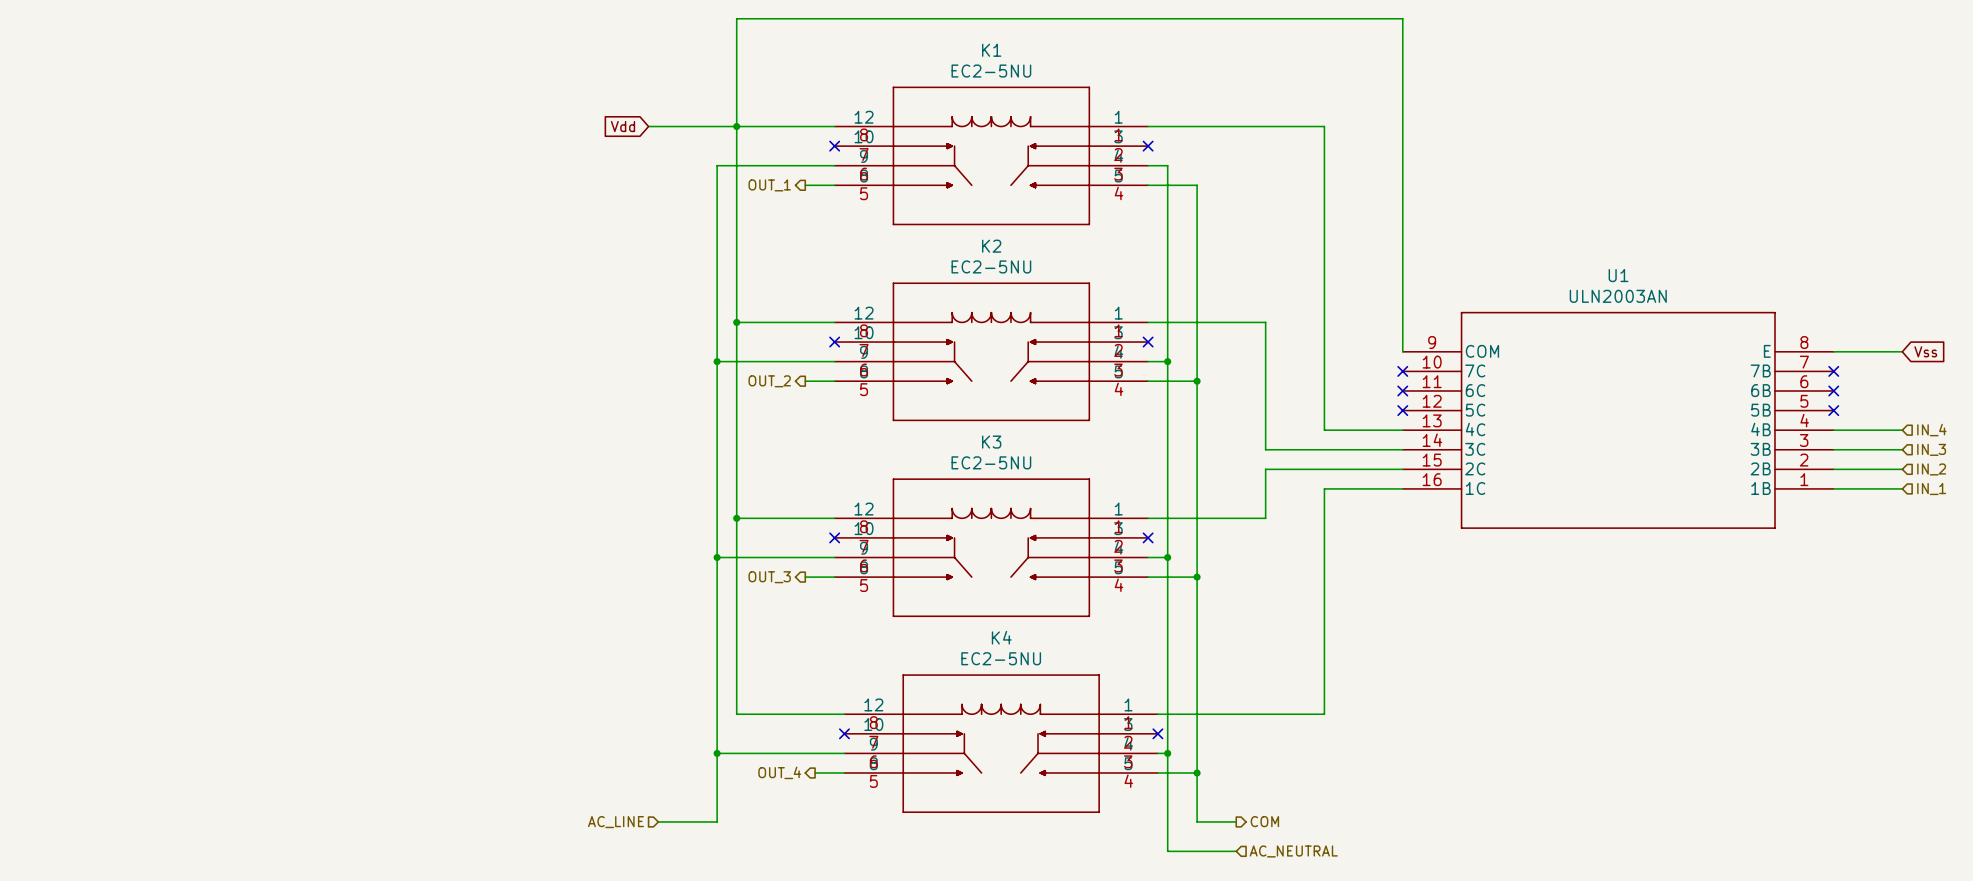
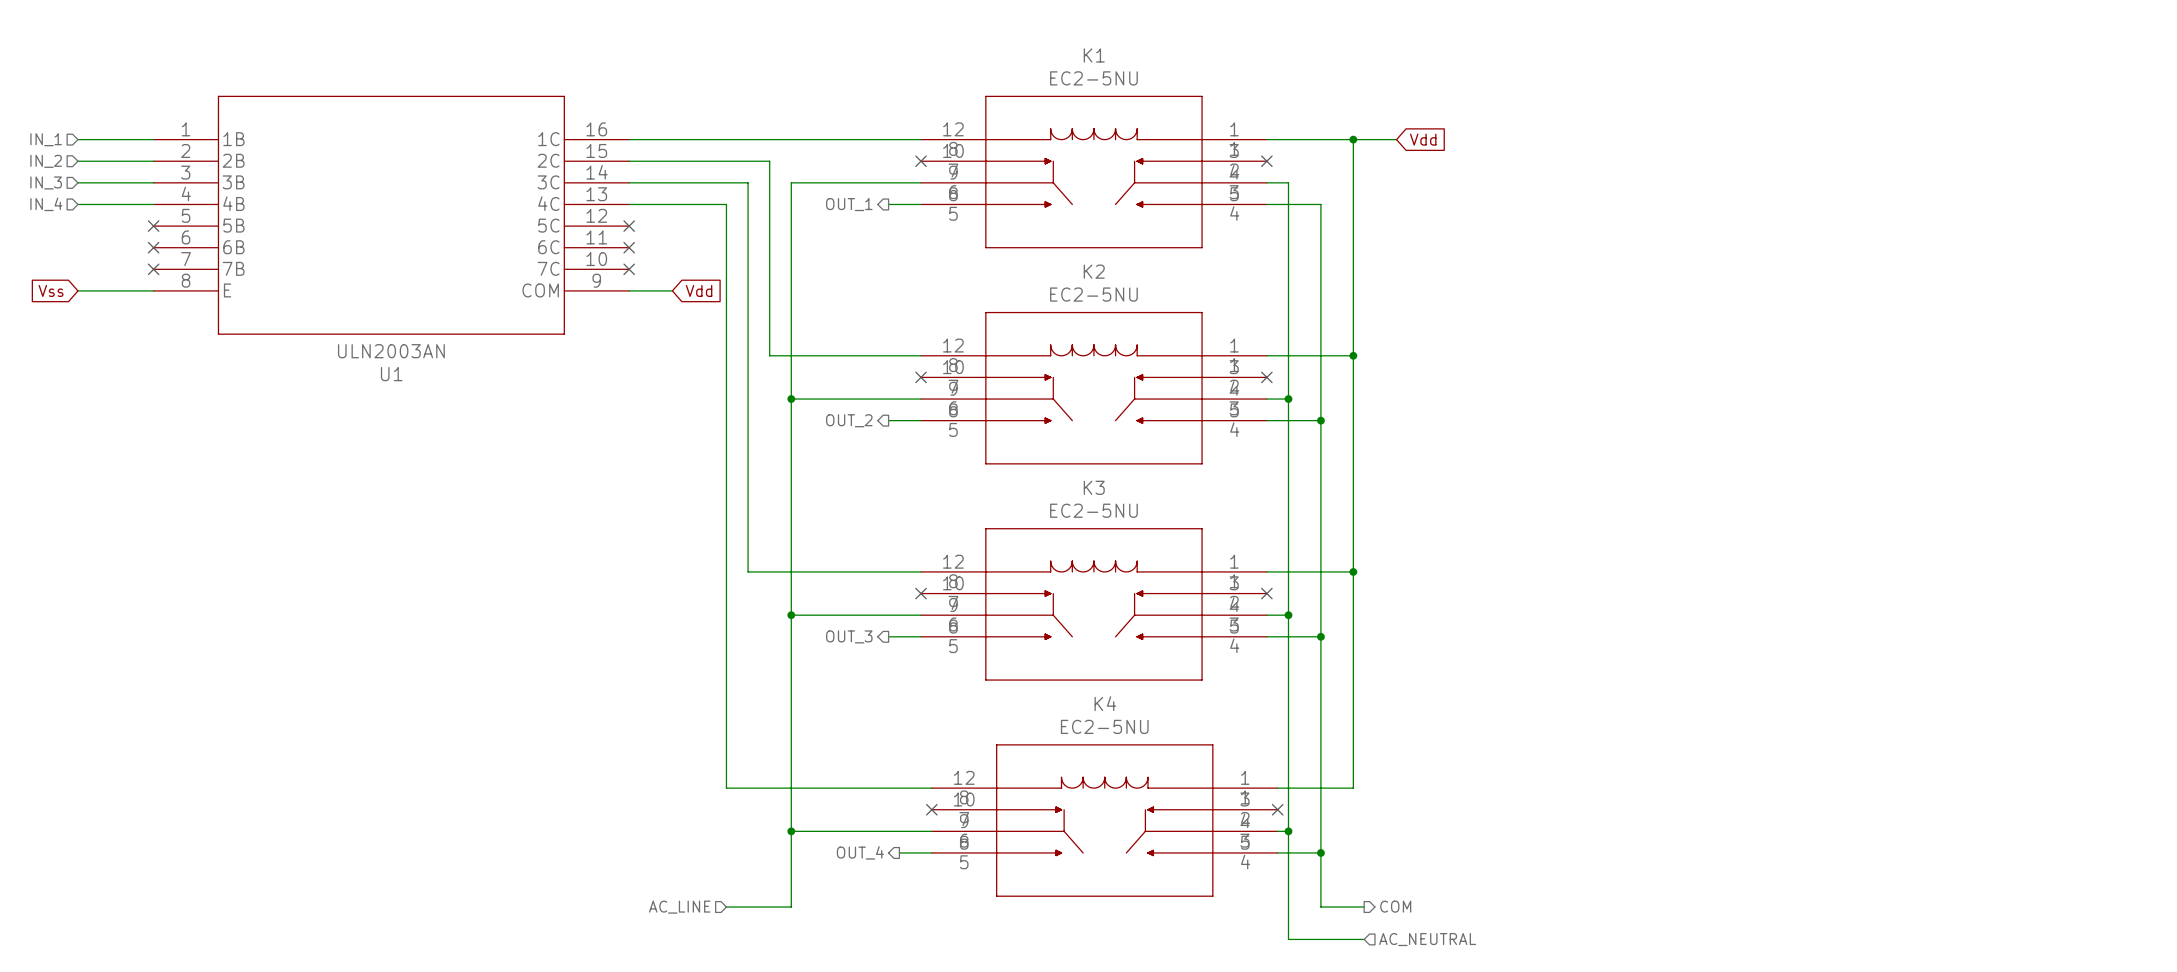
hierarchical label: none -> IN_1 (46, 139)
wire: none -> (77, 139) (153, 139)
wire: none -> (629, 139) (715, 139)
global label rotation: 0° (623, 126) -> 180° (699, 290)
global label position: Vdd (623, 126) -> Vdd (699, 290)
junction: (736, 126) -> none
junction: none -> (1353, 139)
wire: (1265, 126) (1324, 126) (1324, 430) (1402, 430) -> none
global label: none -> Vdd (1423, 139)
hierarchical label: none -> IN_2 (46, 161)
wire: none -> (77, 161) (153, 161)
wire: none -> (629, 161) (769, 161) (769, 355) (812, 355)
hierarchical label: none -> IN_3 (46, 182)
wire: none -> (77, 182) (153, 182)
wire: none -> (629, 182) (748, 182) (748, 571) (812, 571)
hierarchical label: none -> IN_4 (46, 204)
wire: none -> (77, 204) (153, 204)
no-connect mark: none -> (153, 226)
no-connect mark: none -> (629, 226)
no-connect mark: none -> (153, 247)
no-connect mark: none -> (629, 247)
no-connect mark: none -> (153, 269)
no-connect mark: none -> (629, 269)
global label: none -> Vss (51, 290)
wire: none -> (77, 290) (153, 290)
wire: none -> (629, 290) (672, 290)
junction: (736, 322) -> none
wire: (1226, 322) (1265, 322) (1265, 449) (1402, 449) -> none
junction: none -> (1353, 355)
wire: (1402, 351) (1402, 18) (736, 18) (736, 714) -> (629, 204) (726, 204) (726, 788) (812, 788)
wire: (1833, 351) (1902, 351) -> none
global label: Vss (1925, 351) -> none
no-connect mark: (1402, 371) -> none
no-connect mark: (1833, 371) -> none
no-connect mark: (1402, 390) -> none
no-connect mark: (1833, 390) -> none
no-connect mark: (1402, 410) -> none
no-connect mark: (1833, 410) -> none
U1 rotation: 0° (1618, 420) -> 180° (391, 215)
U1 position: (1618, 420) -> (391, 215)
wire: (1833, 430) (1902, 430) -> none
hierarchical label: IN_4 (1931, 430) -> none
wire: (1833, 449) (1902, 449) -> none
hierarchical label: IN_3 (1931, 449) -> none
wire: (1402, 469) (1265, 469) (1265, 518) (1226, 518) -> none
wire: (1833, 469) (1902, 469) -> none
hierarchical label: IN_2 (1931, 469) -> none
wire: (1402, 488) (1324, 488) (1324, 714) (1226, 714) -> (1353, 139) (1353, 788)
wire: (1833, 488) (1902, 488) -> none
hierarchical label: IN_1 (1931, 489) -> none
junction: (736, 518) -> none
junction: none -> (1353, 571)

